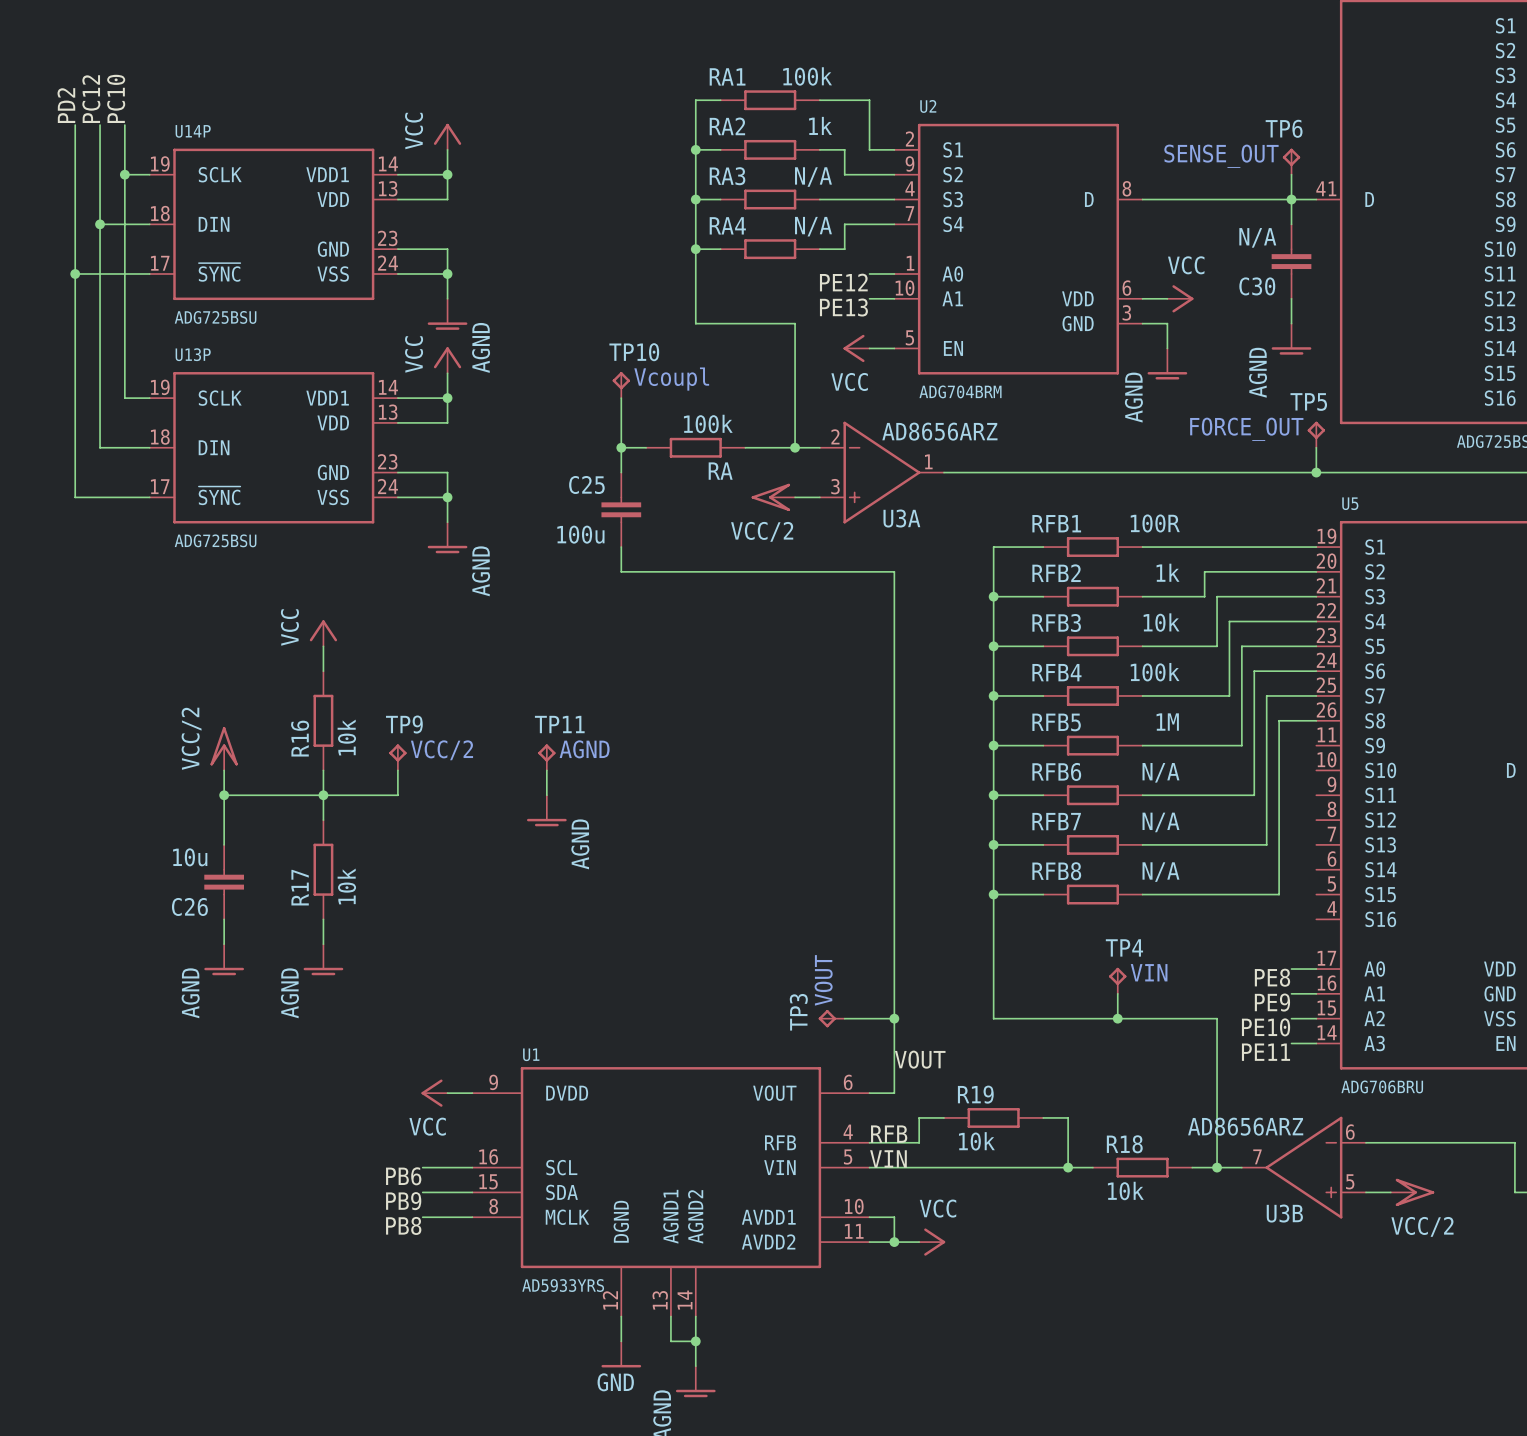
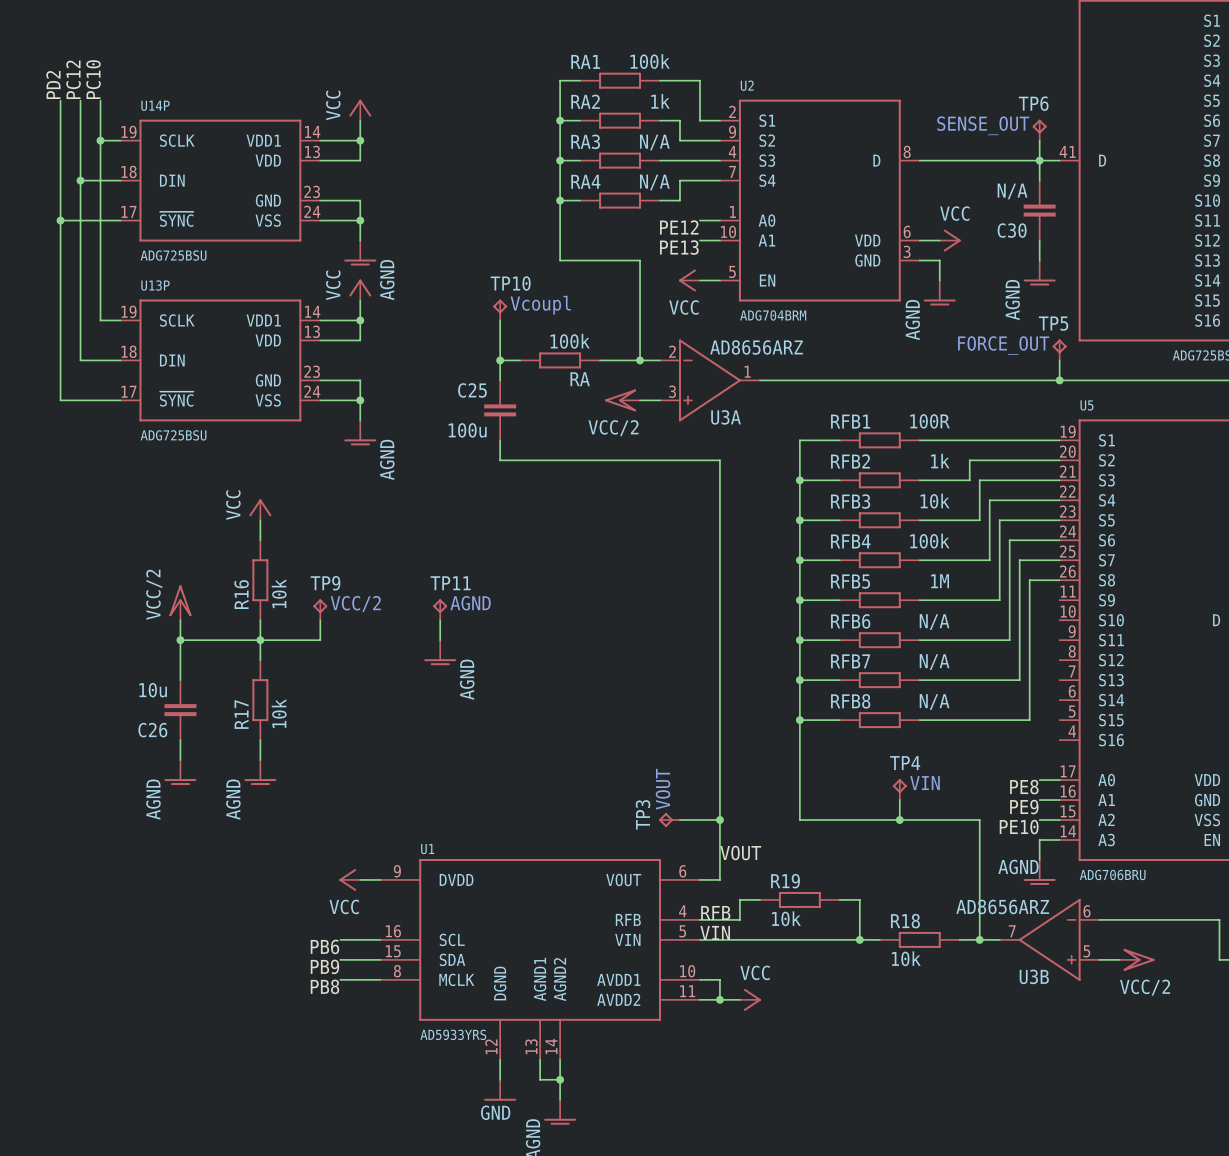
wire: none -> (1039, 840) (1039, 859)
label: PE11 (1265, 1052) -> none
power symbol: none -> AGND (1039, 872)

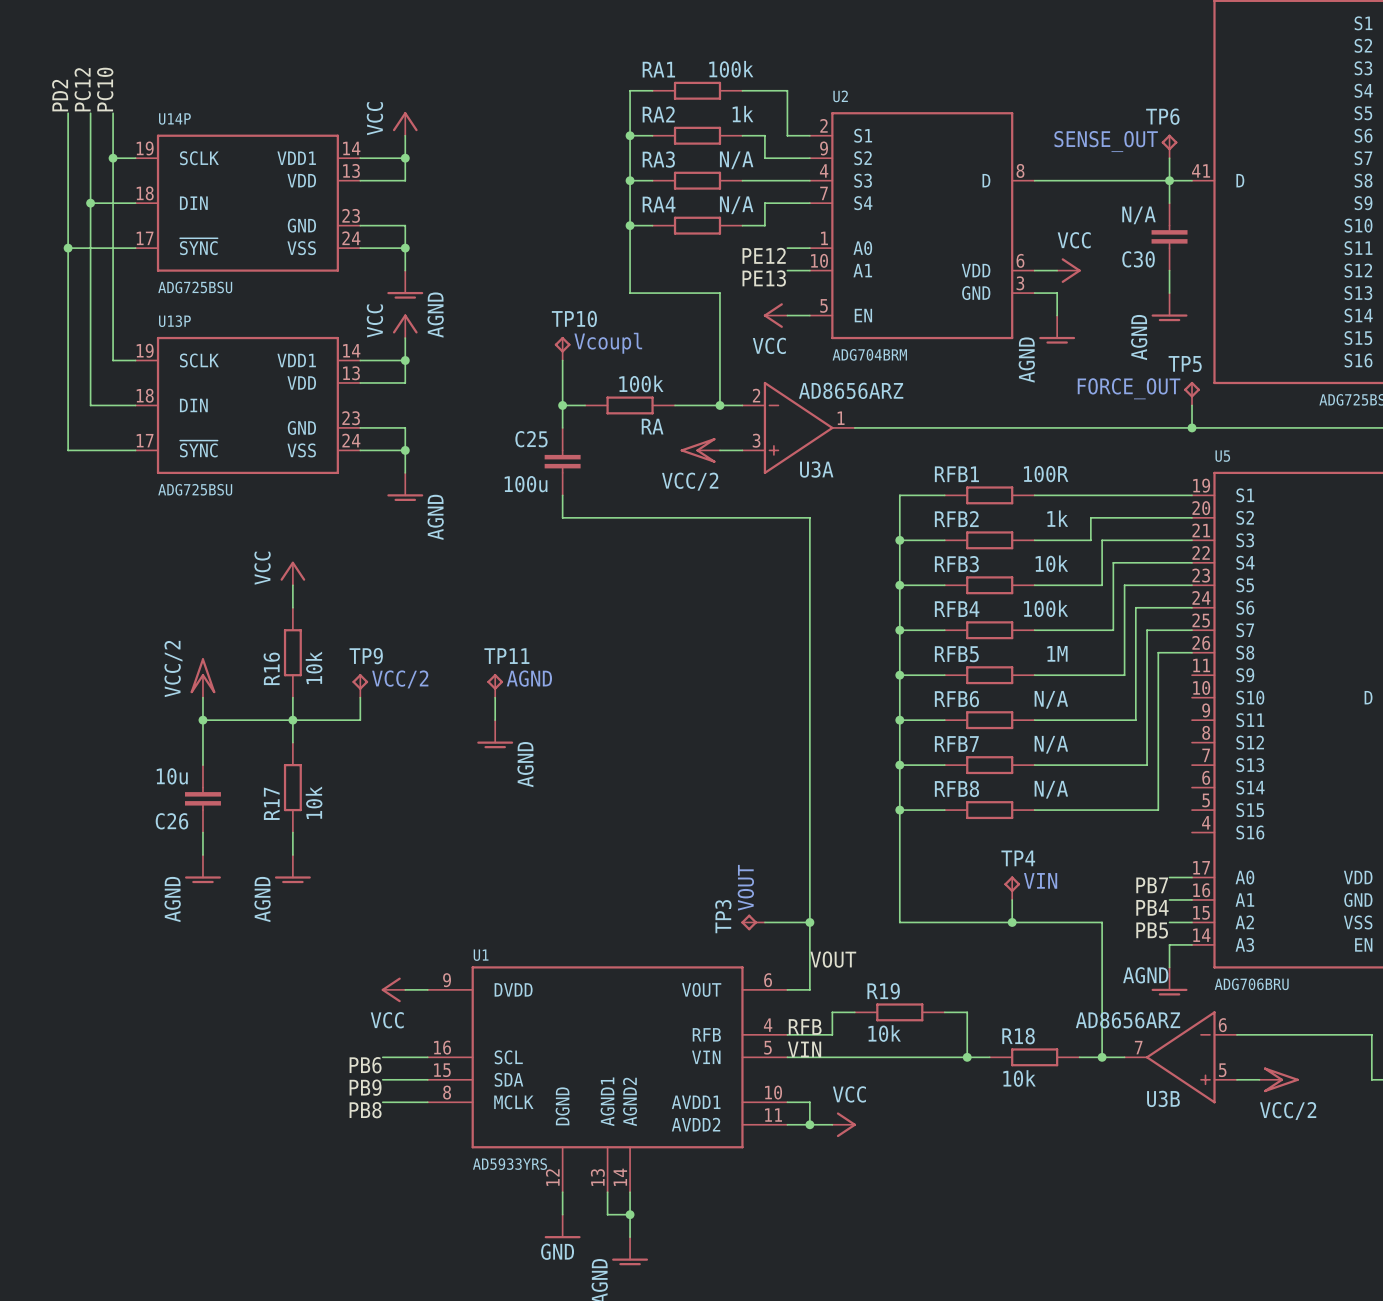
label: PE8 (1024, 787) -> PB7 (1152, 885)
label: PE9 (1024, 807) -> PB4 (1152, 907)
label: PE10 (1019, 827) -> PB5 (1152, 930)

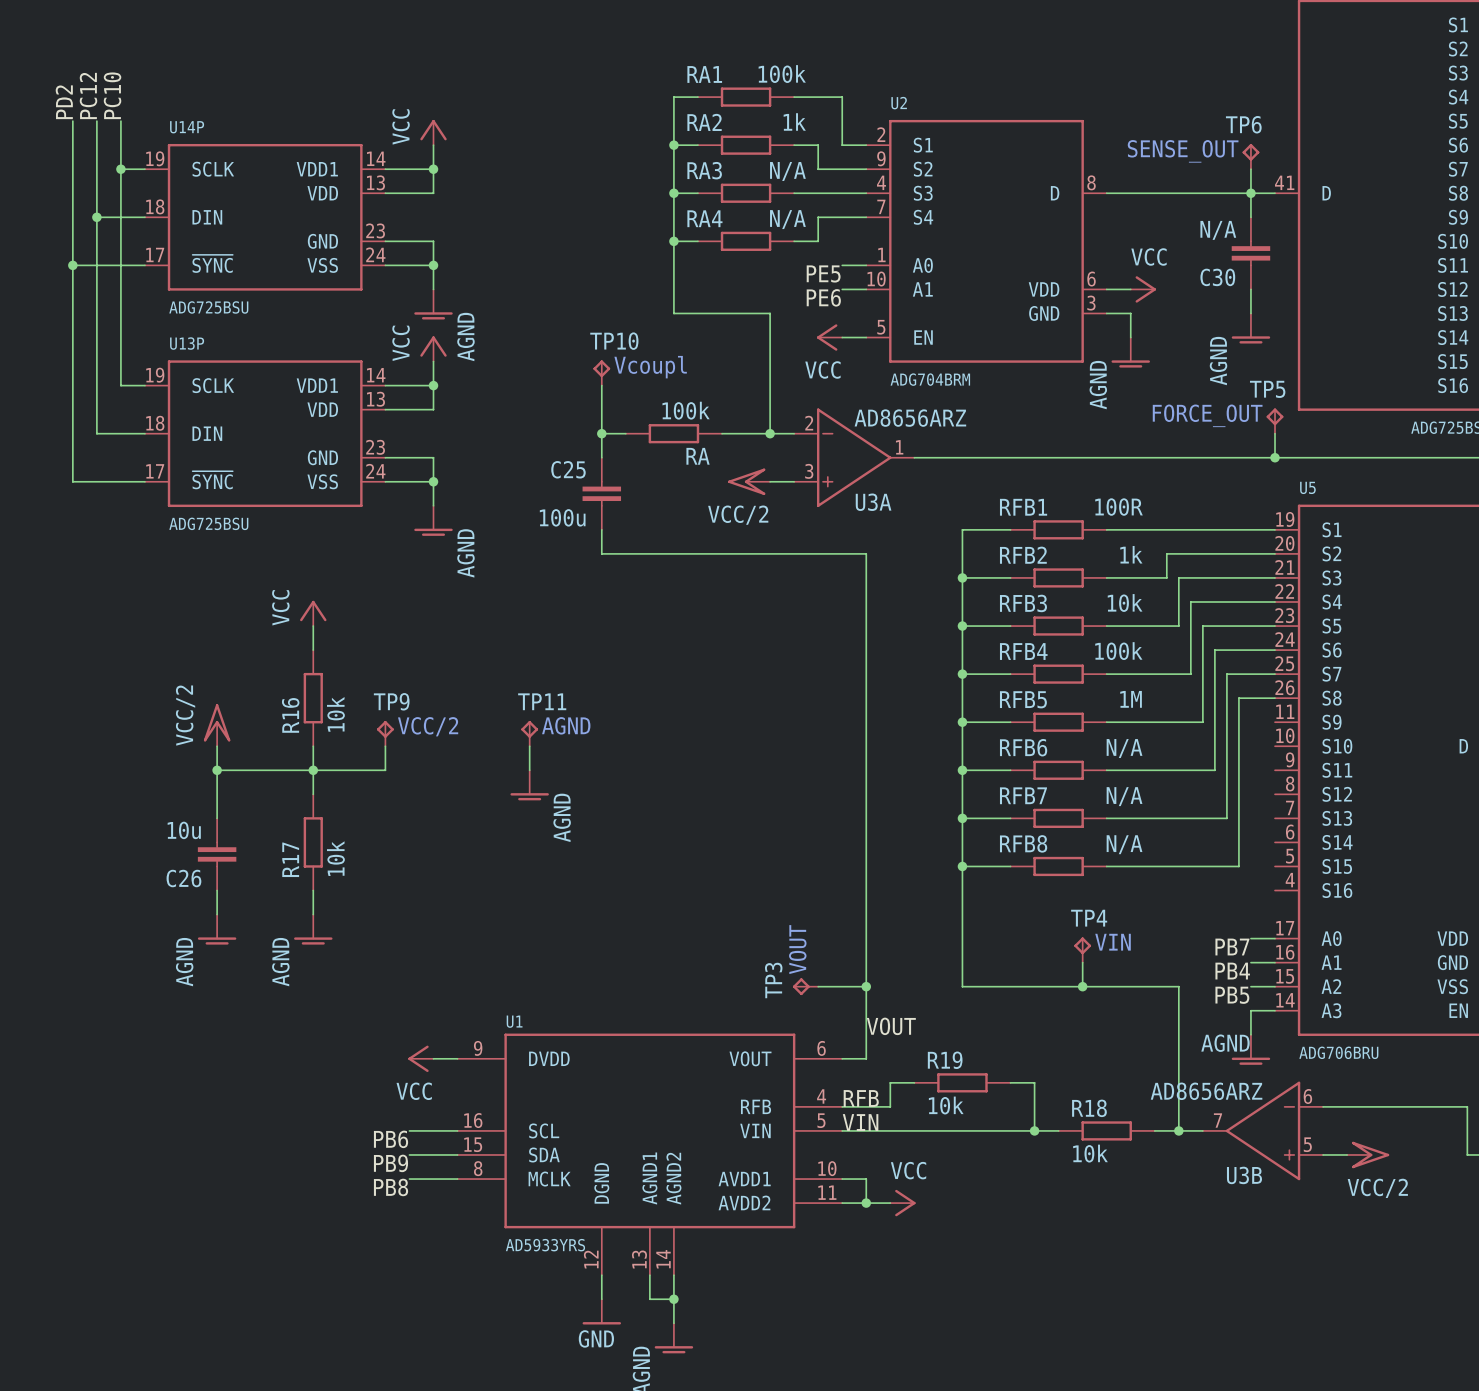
label: PE12 (764, 255) -> PE5 (823, 273)
label: PE13 (764, 278) -> PE6 (823, 297)

